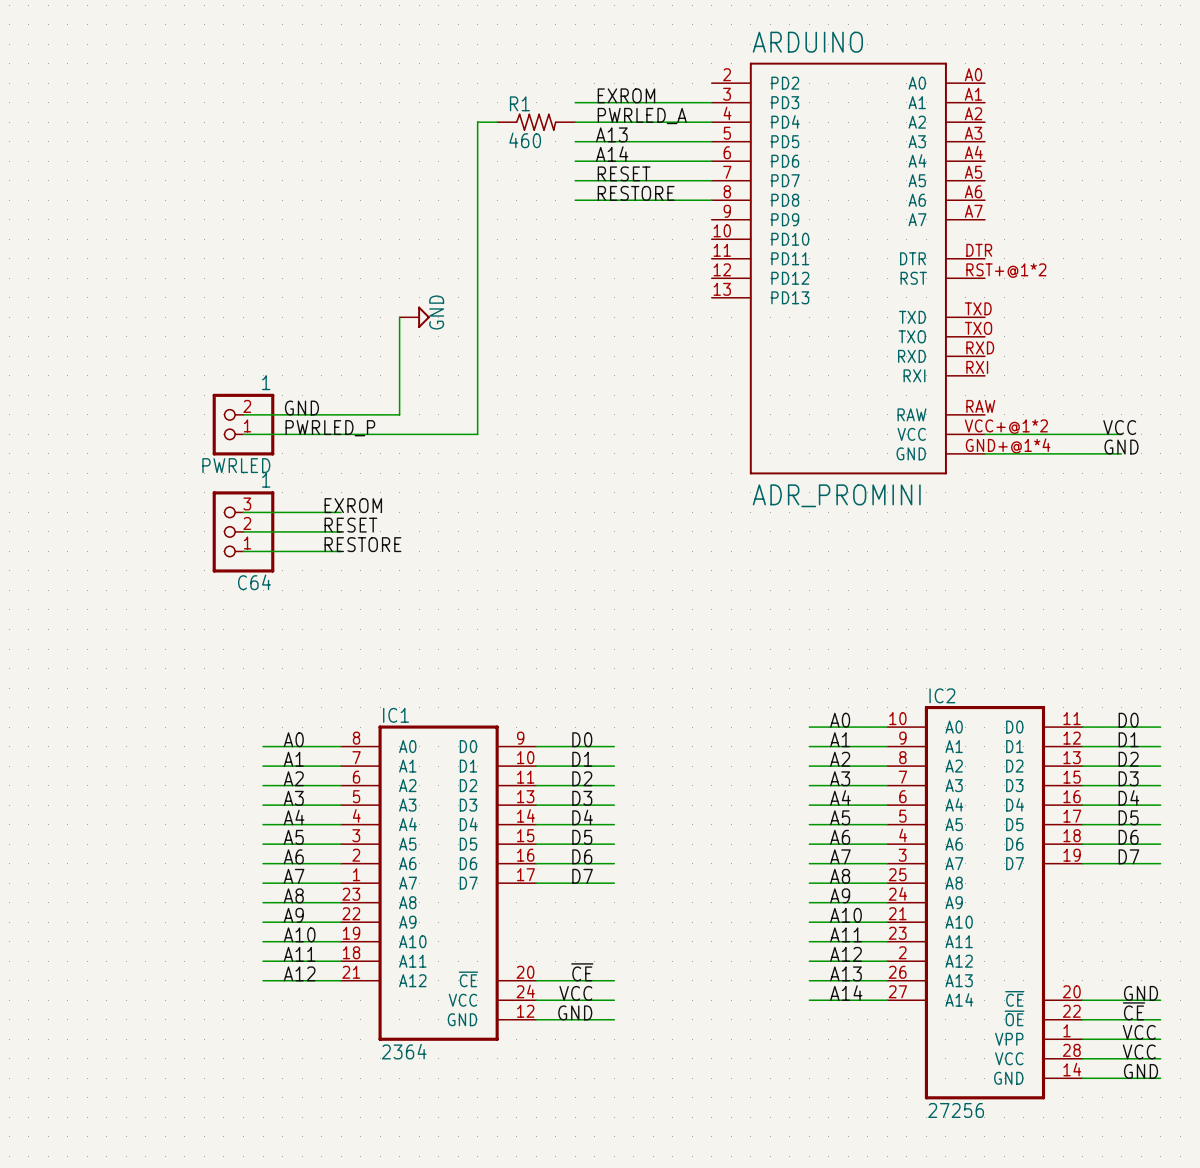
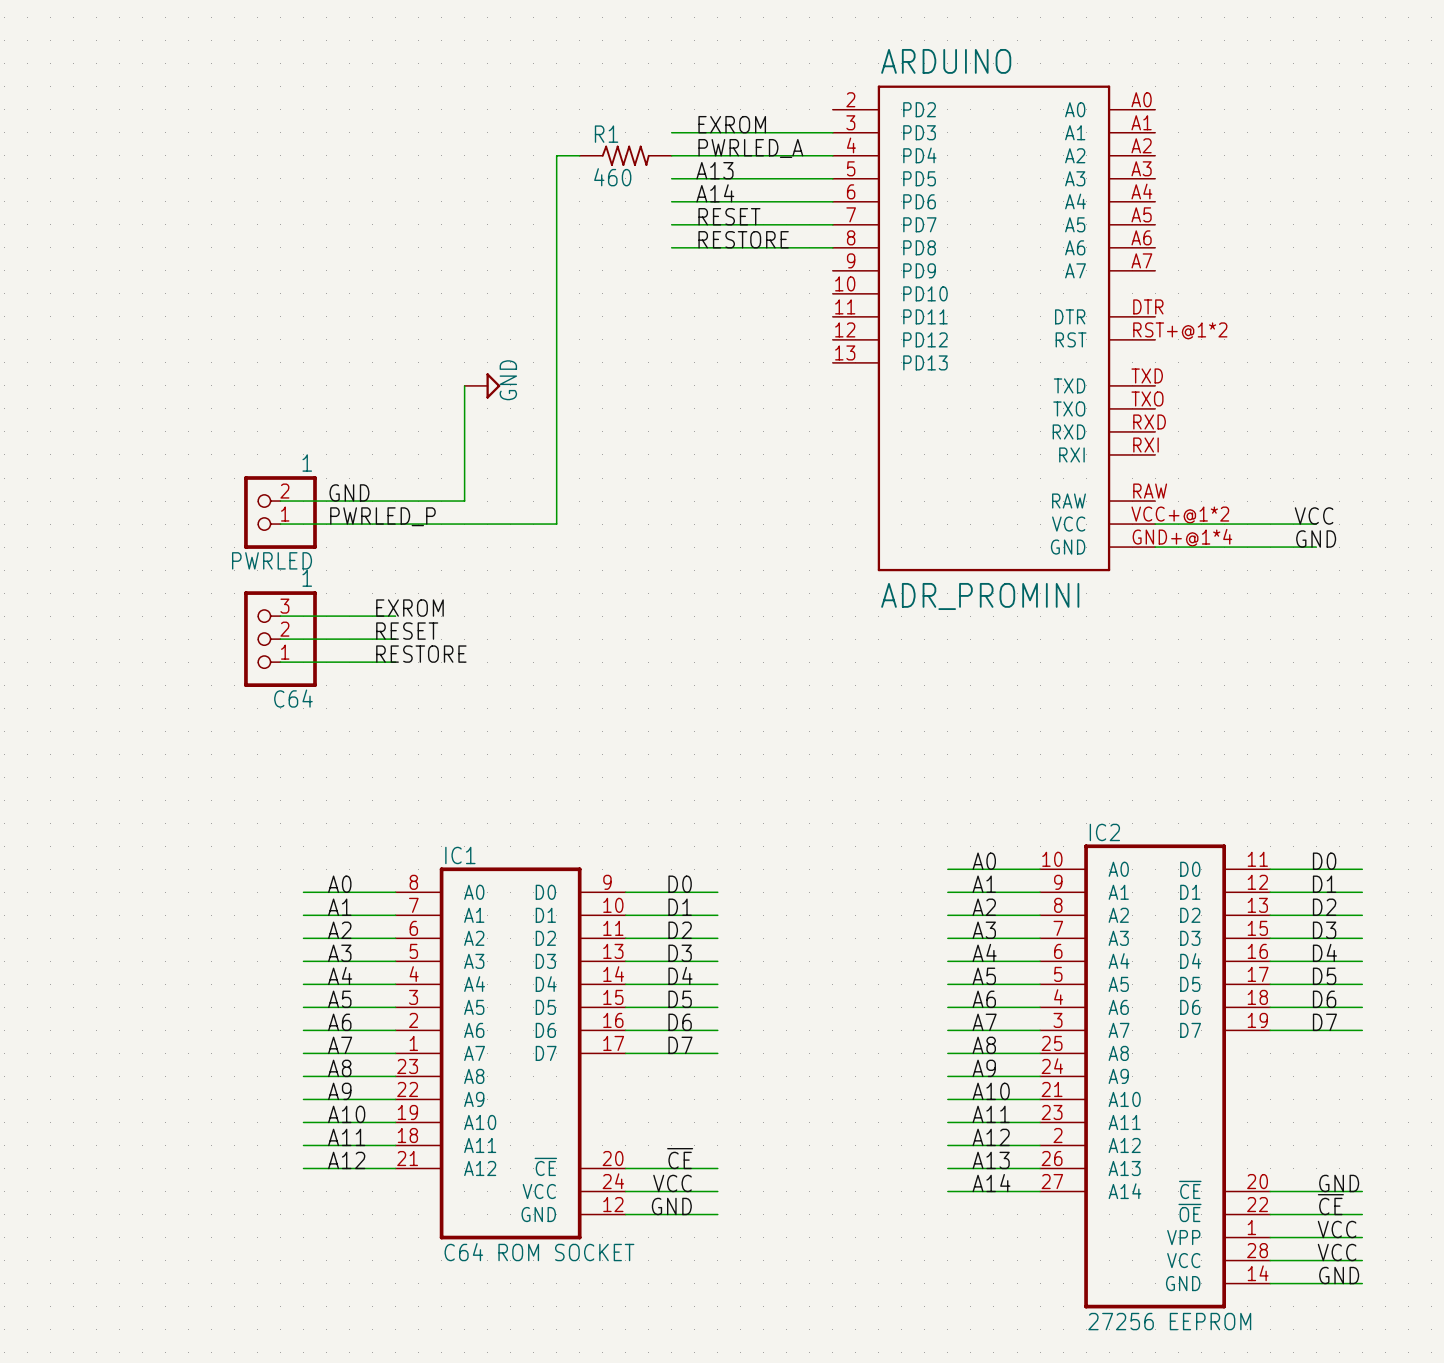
IC1 value: 2364 (404, 1051) -> C64 ROM SOCKET (539, 1252)
IC2 value: 27256 (956, 1110) -> 27256 EEPROM (1169, 1321)

